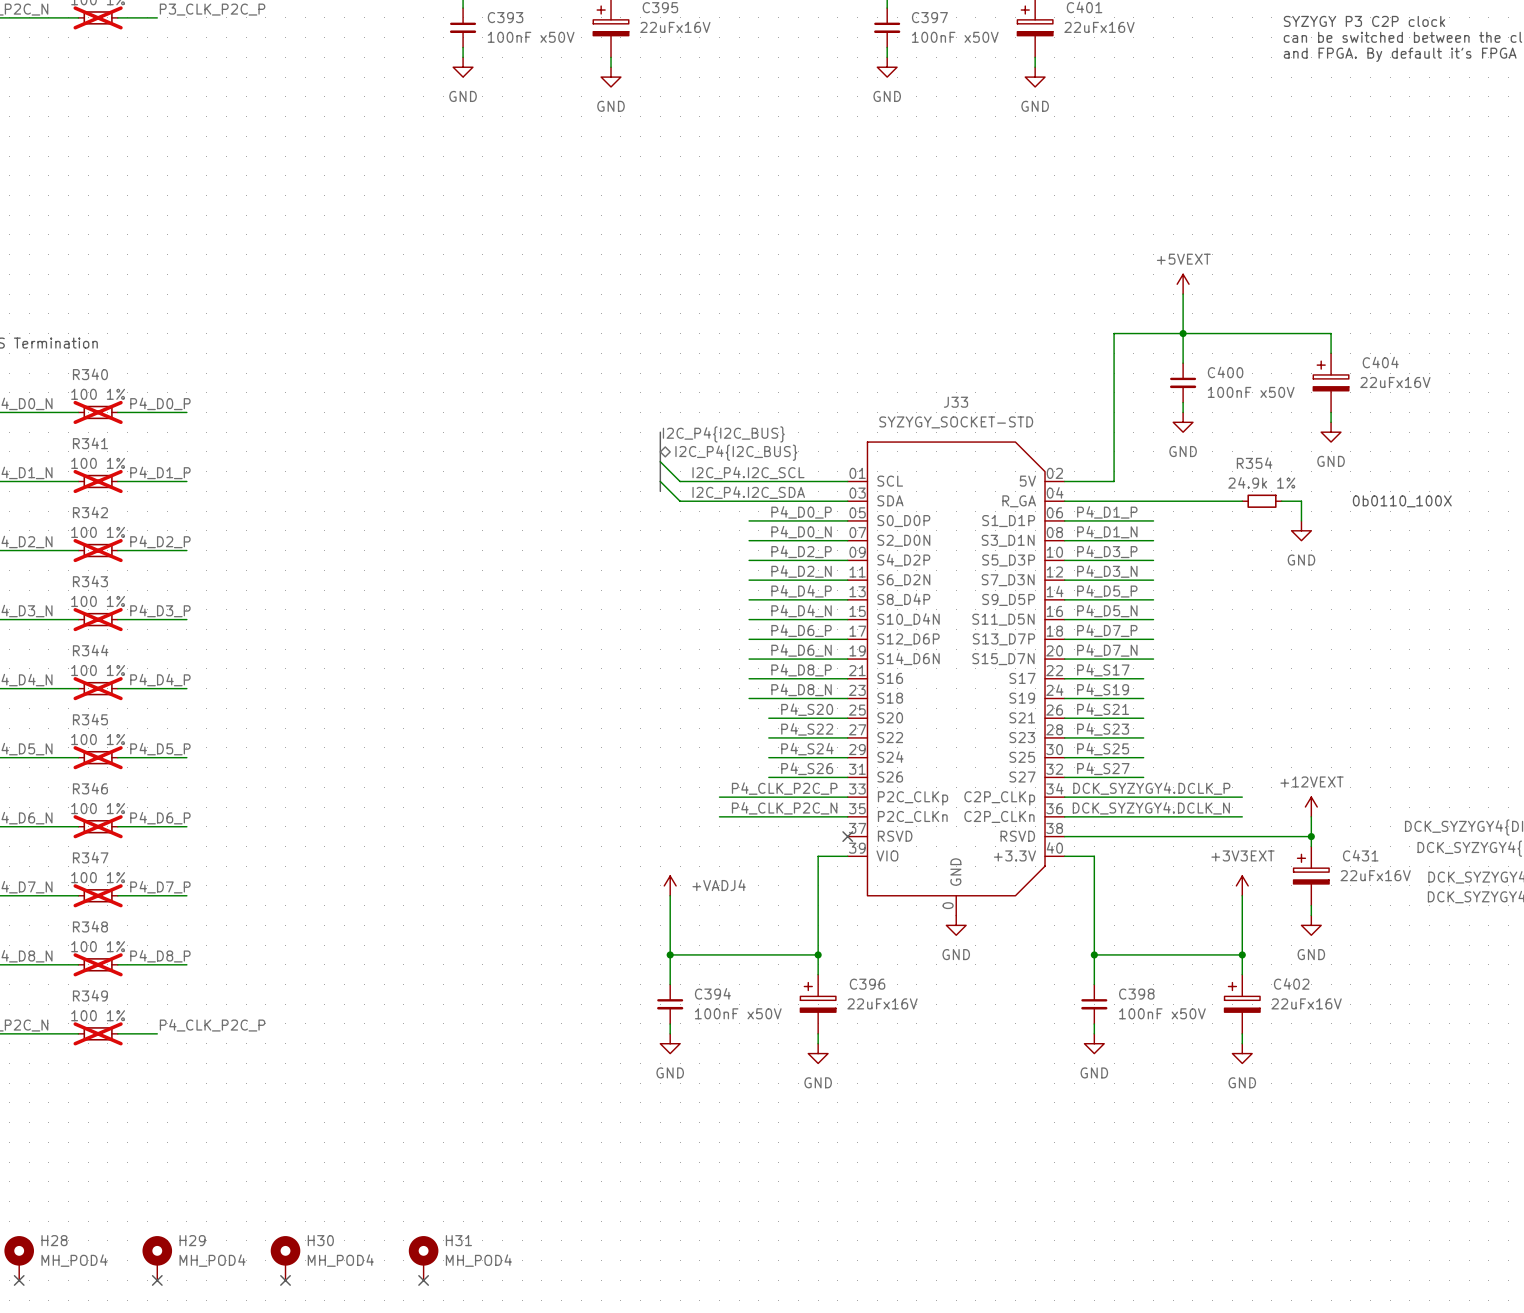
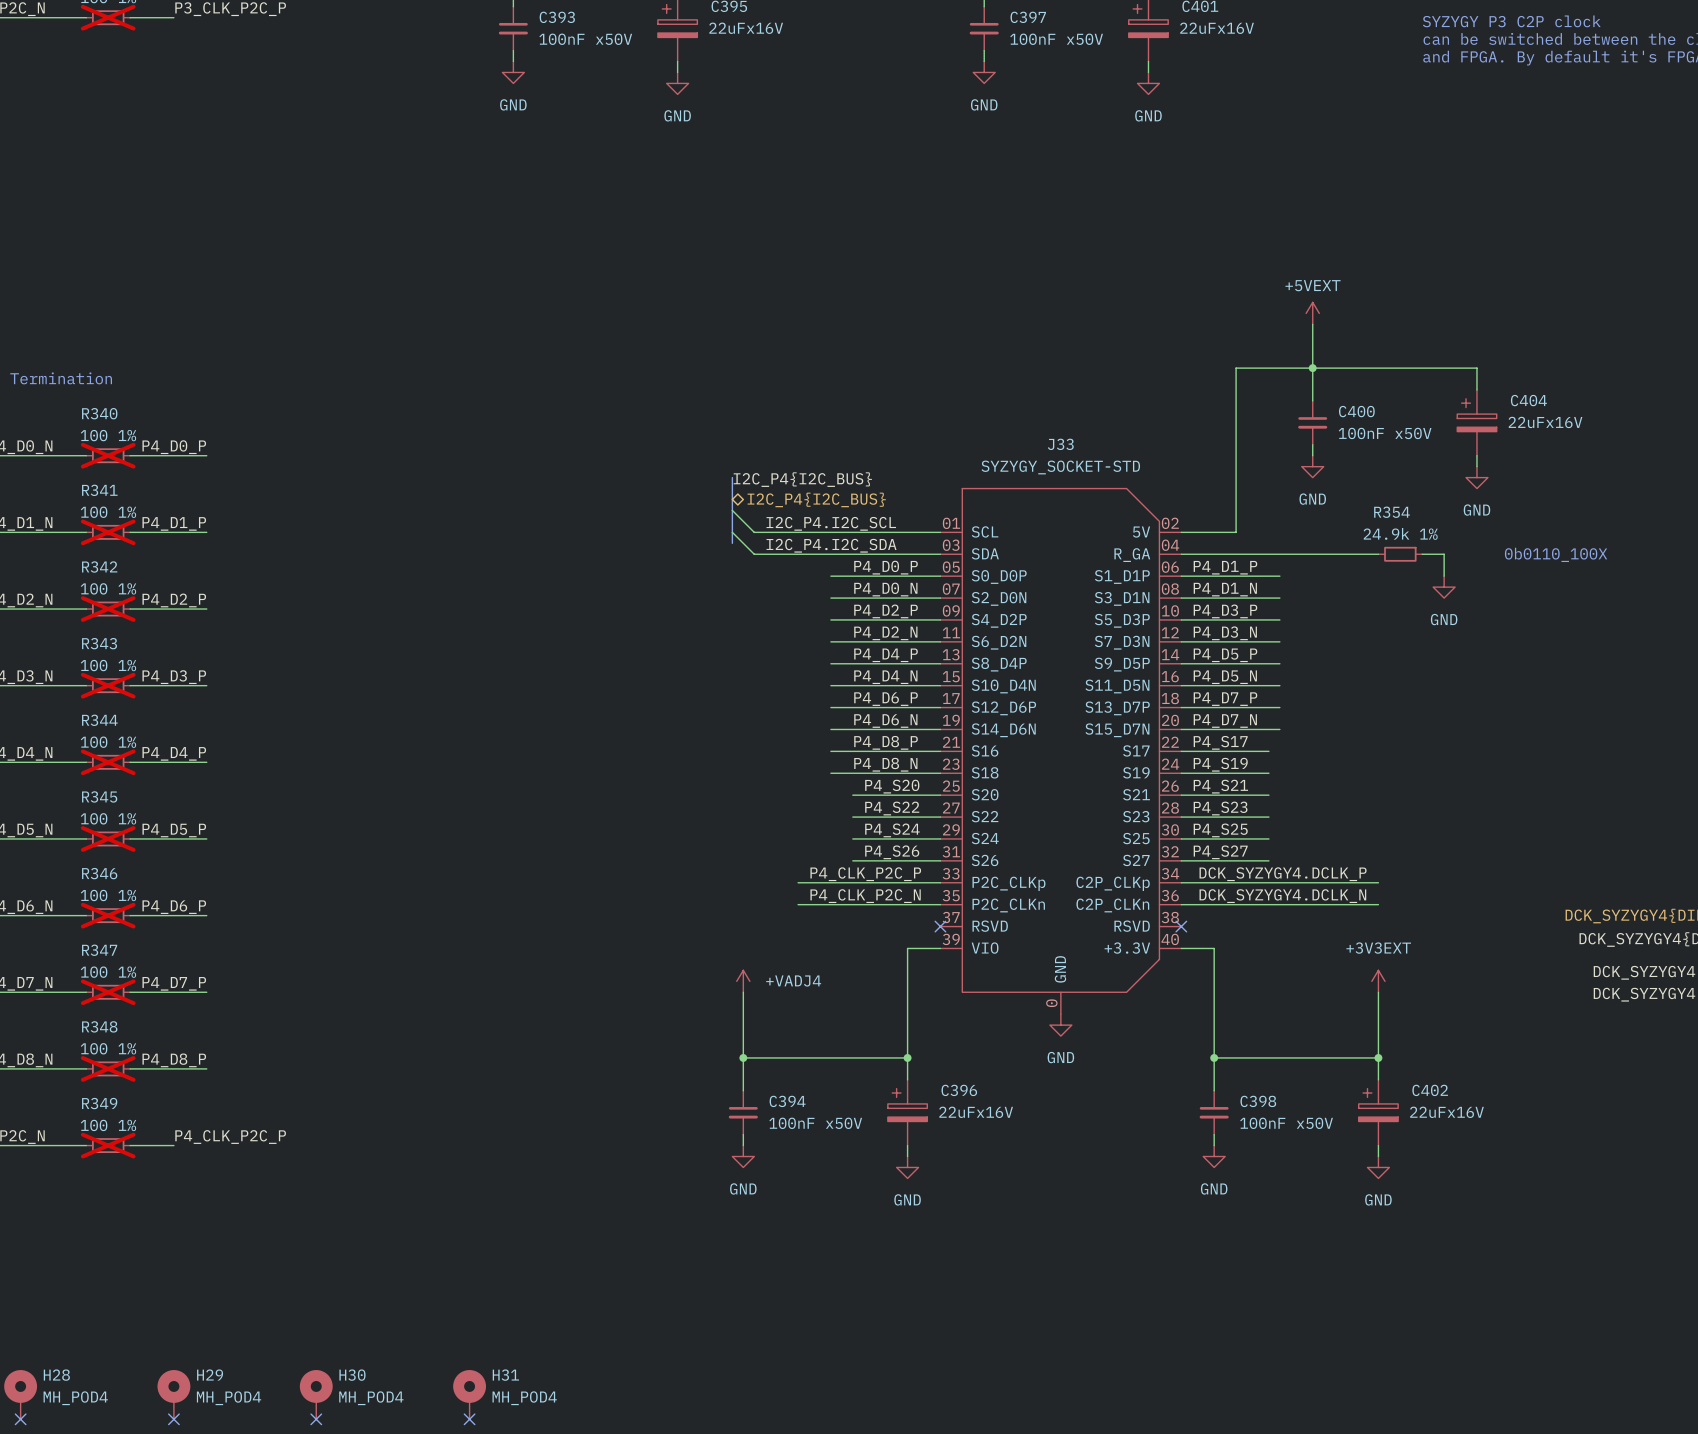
power symbol: +12VEXT (1311, 807) -> none
wire: (1311, 816) (1311, 846) -> none
wire: (1064, 836) (1311, 836) -> none
no-connect mark: none -> (1181, 926)
junction: (1311, 836) -> none
C431: 22uFx16V (1311, 876) -> none
wire: (1311, 905) (1311, 915) -> none
power symbol: GND (1311, 925) -> none

